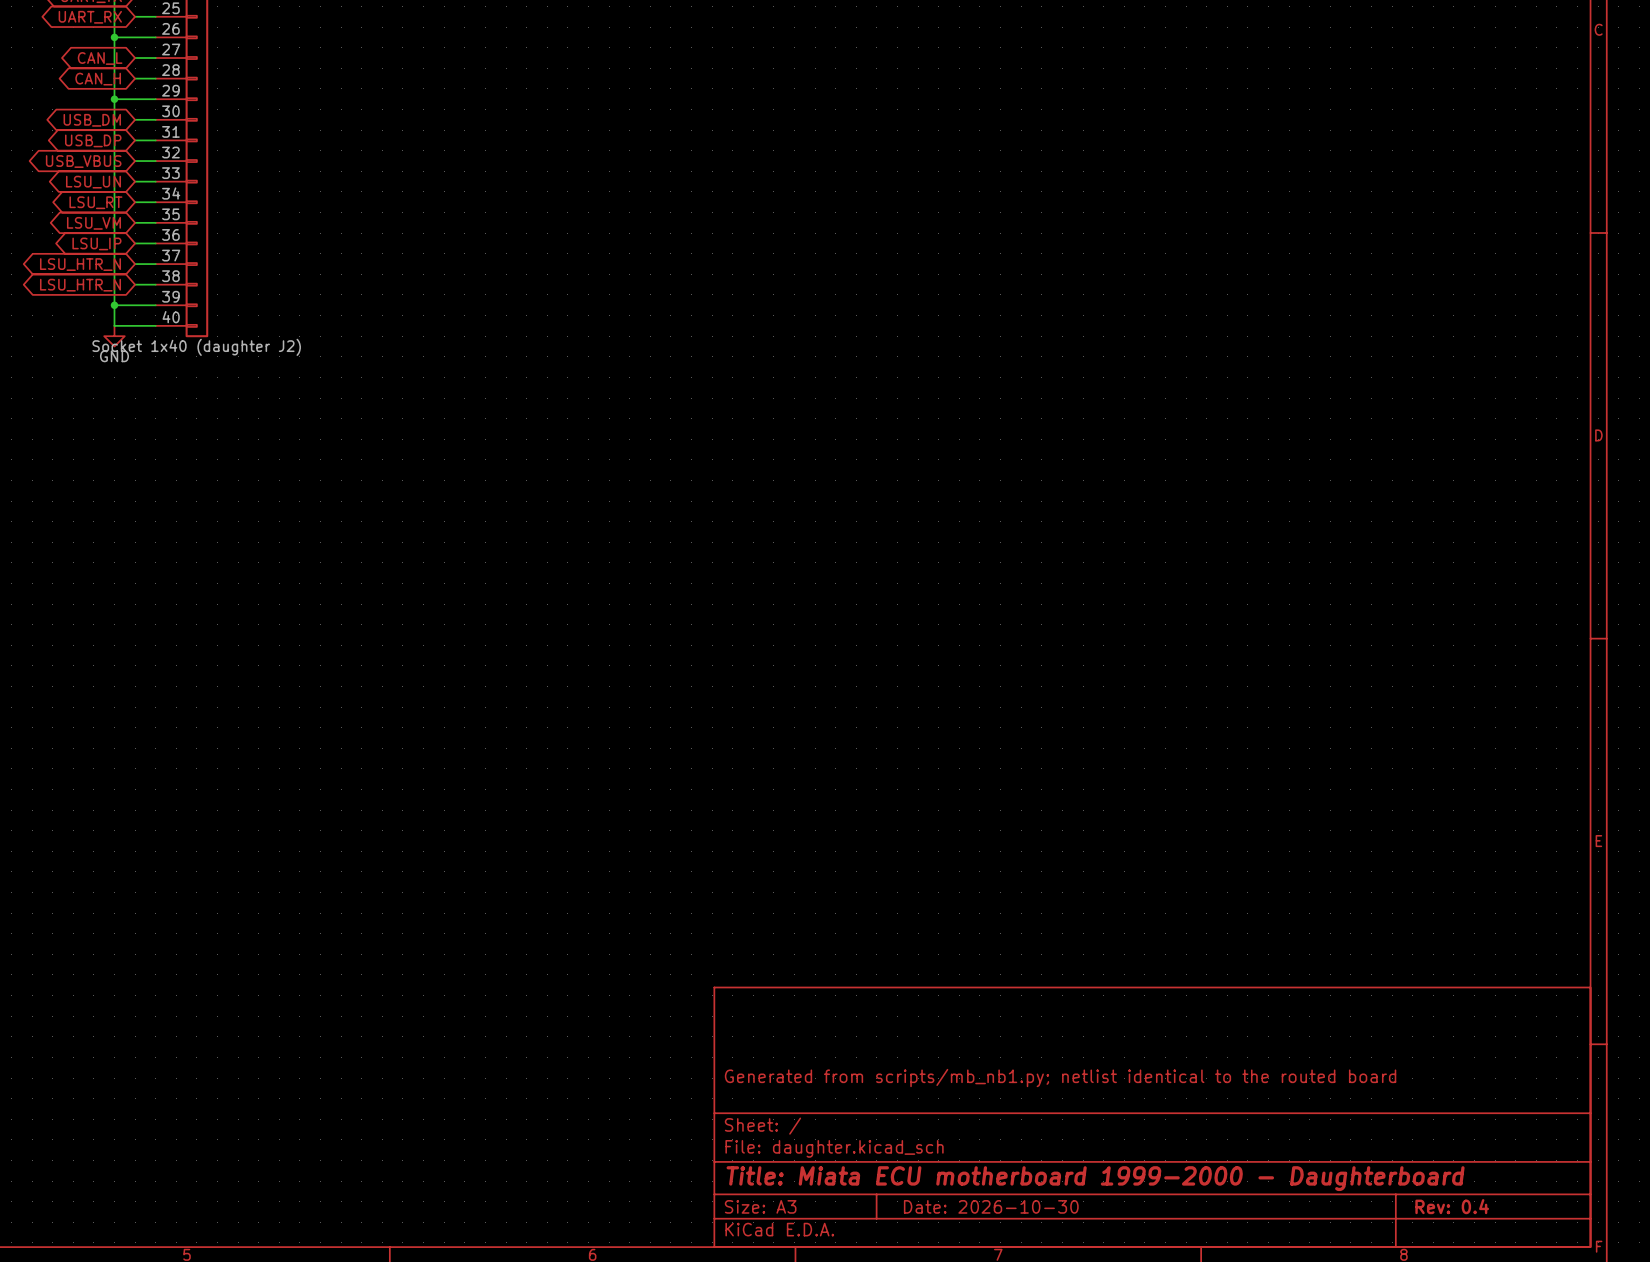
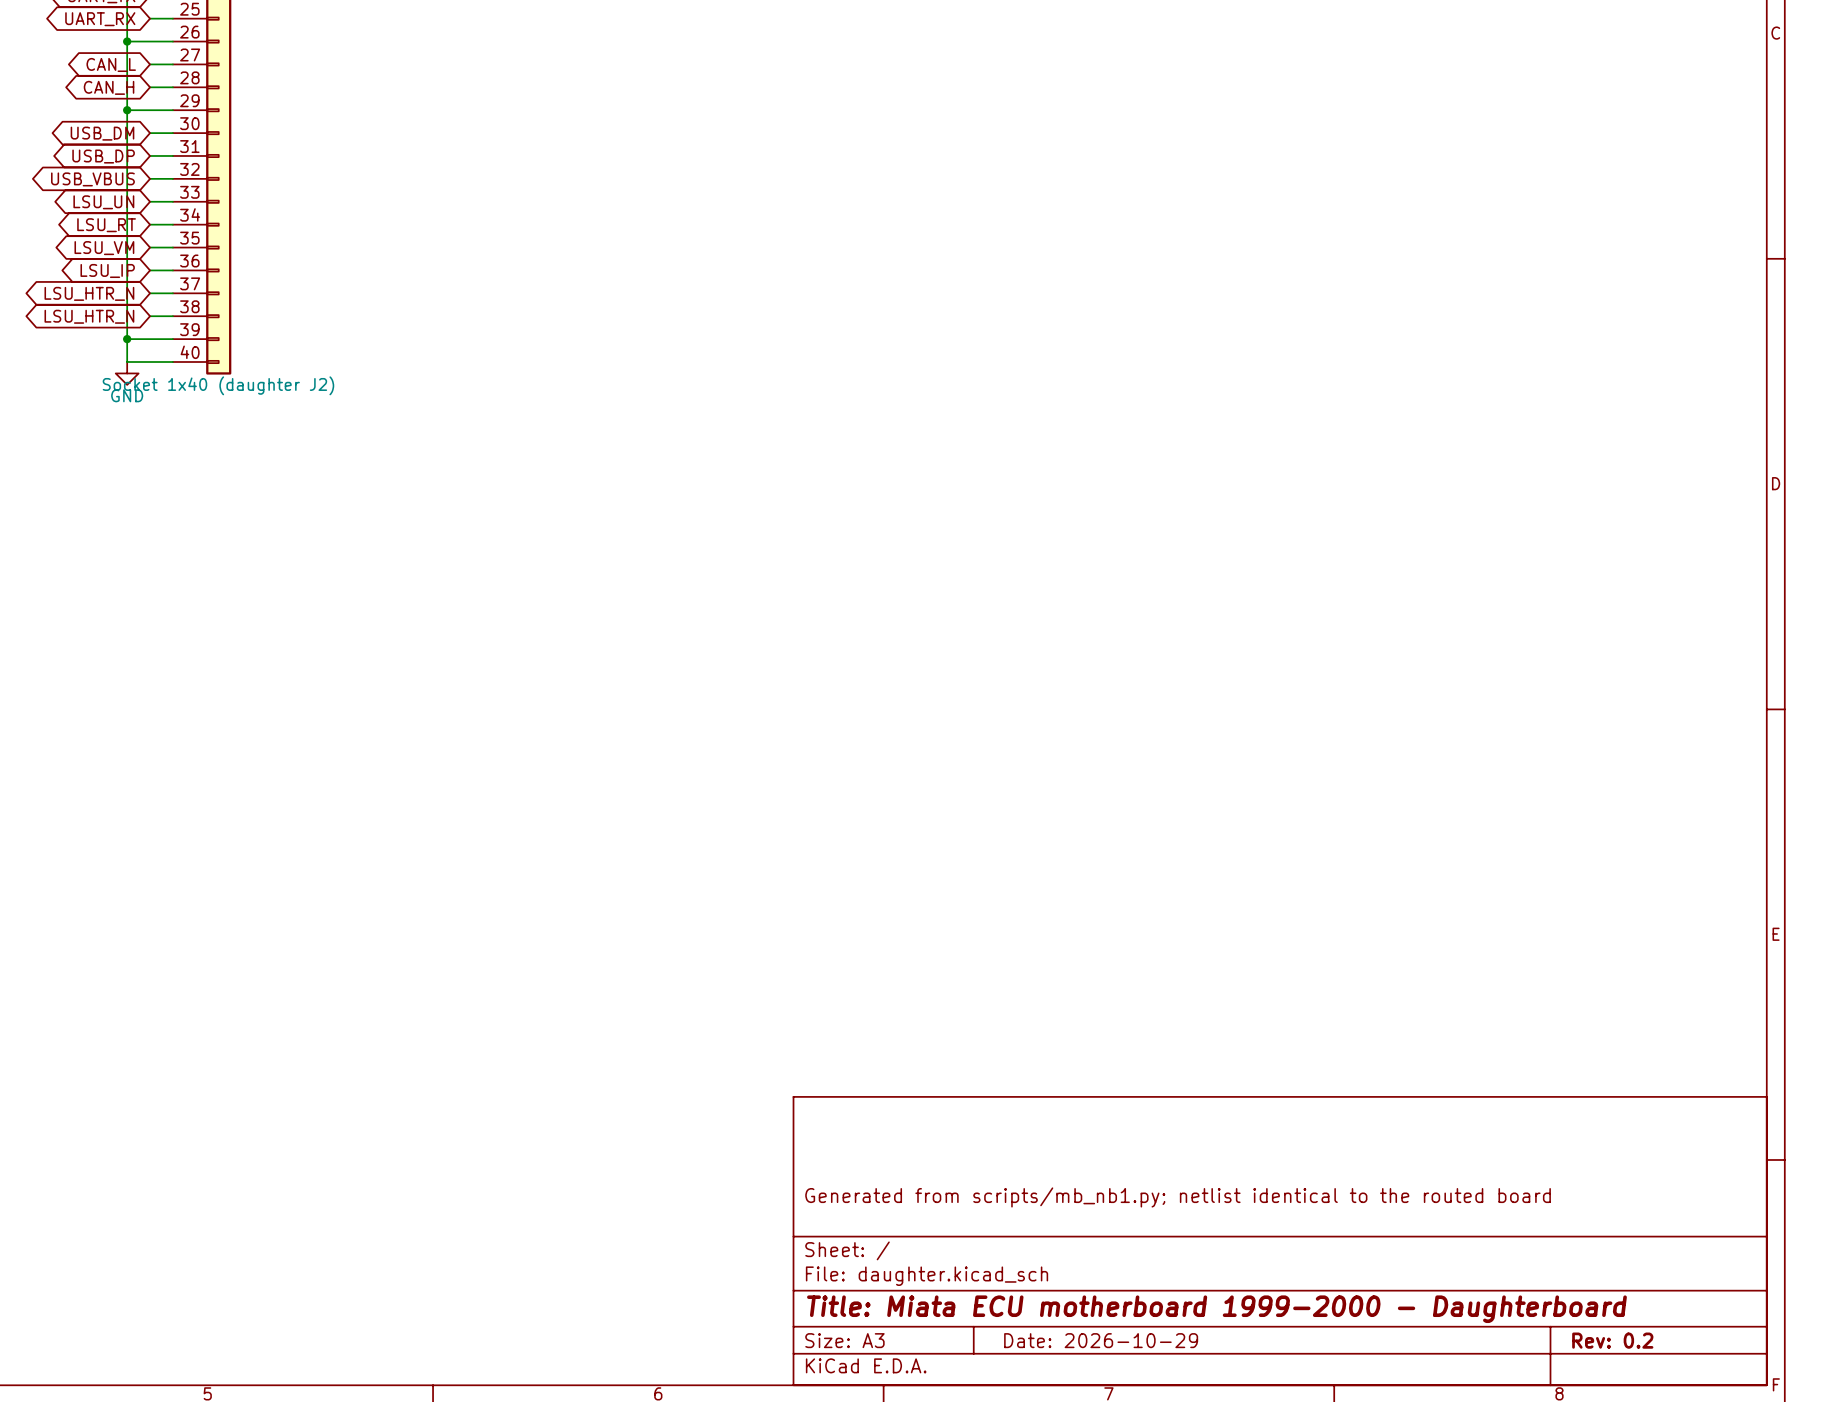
title block: Date: 2026-10-30 (991, 1206) -> Date: 2026-10-29 (1101, 1340)
title block: Rev: 0.4 (1452, 1206) -> Rev: 0.2 (1612, 1340)

